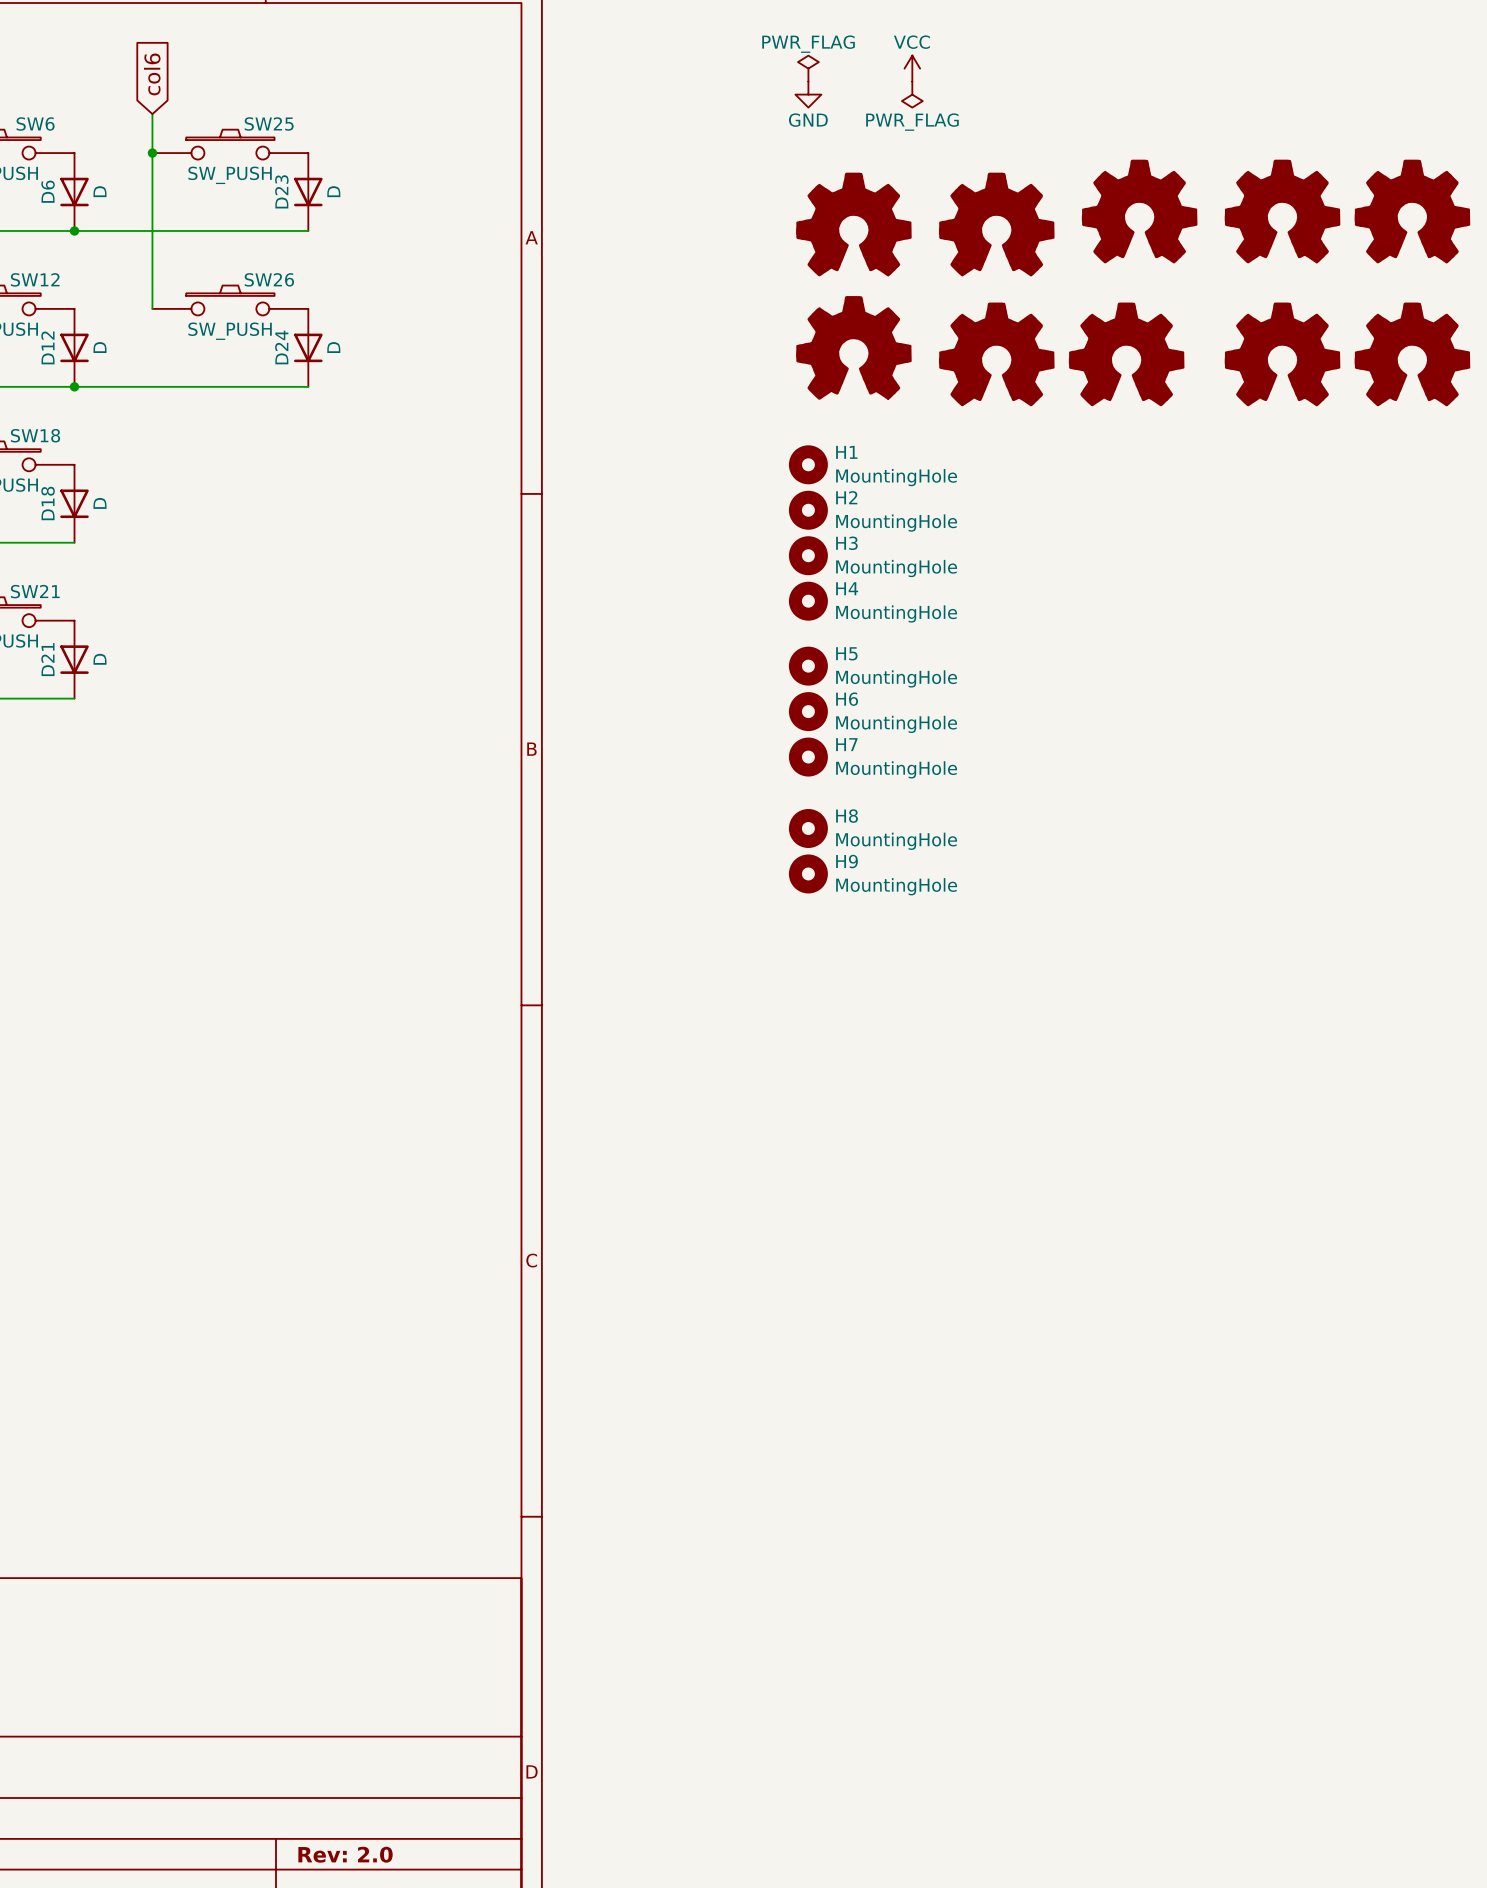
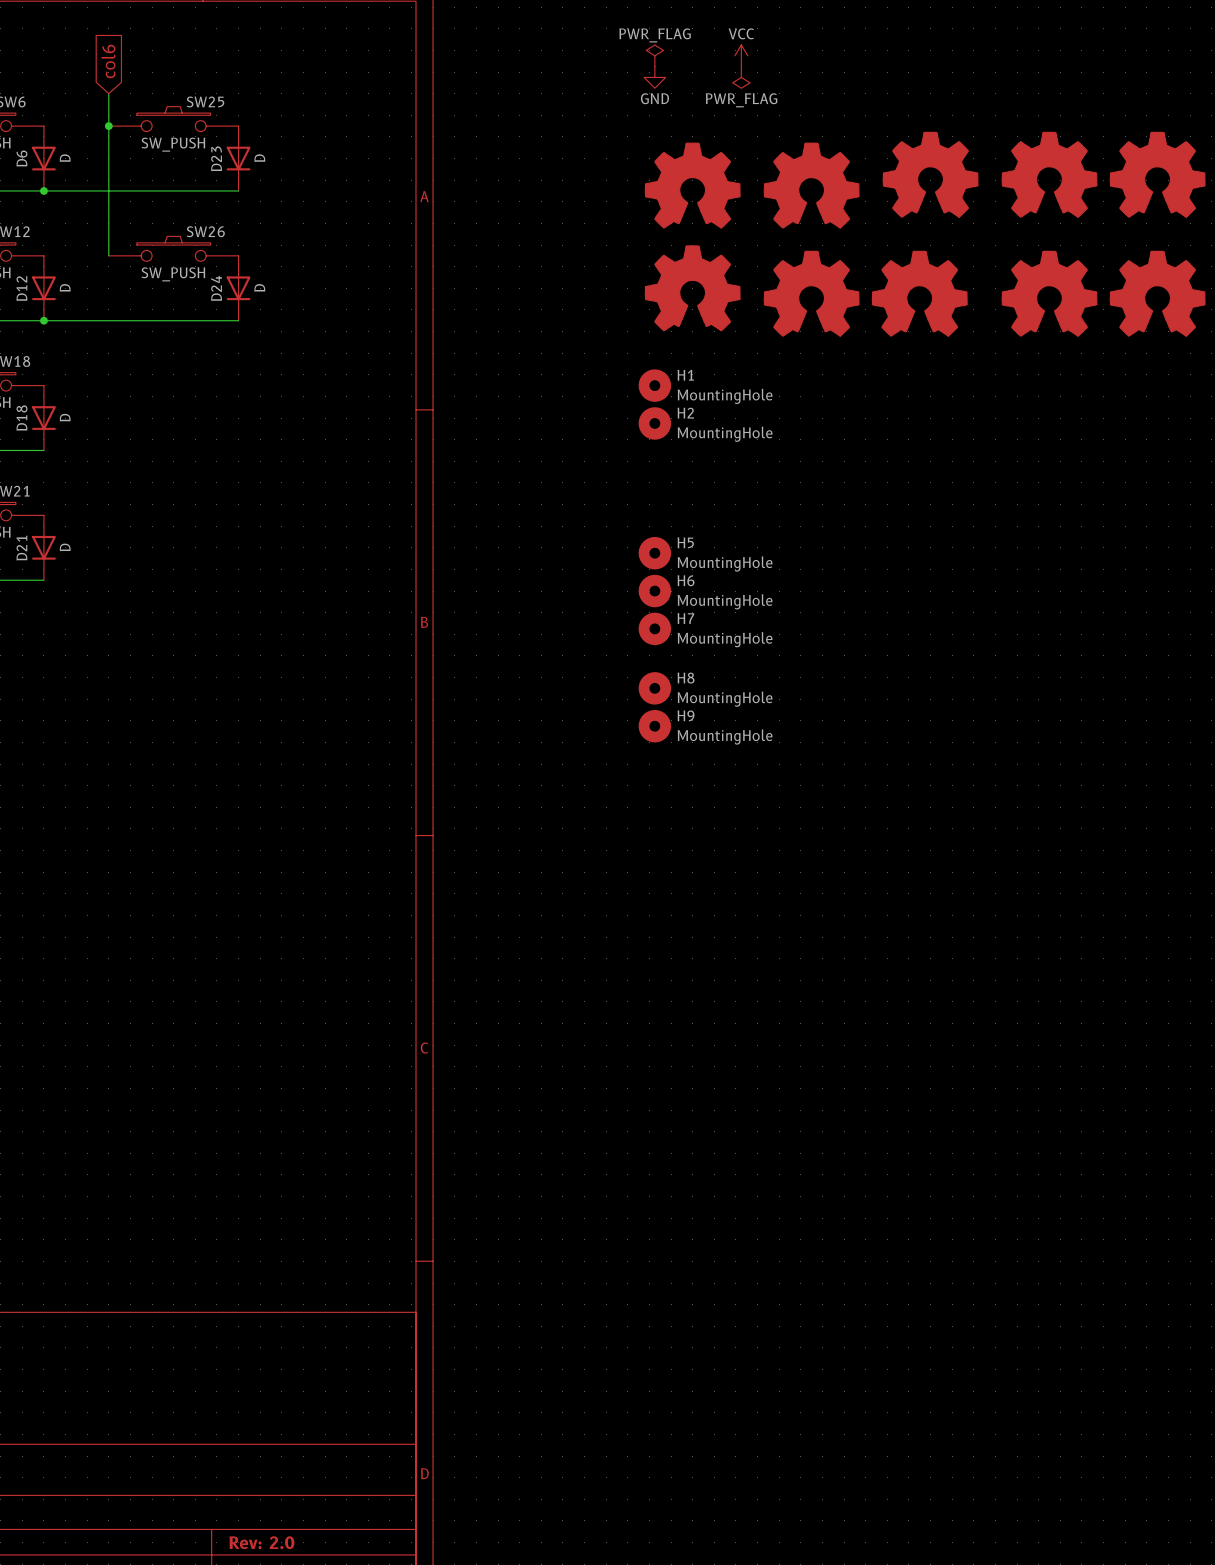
H3: MountingHole (808, 555) -> none
H4: MountingHole (808, 601) -> none

